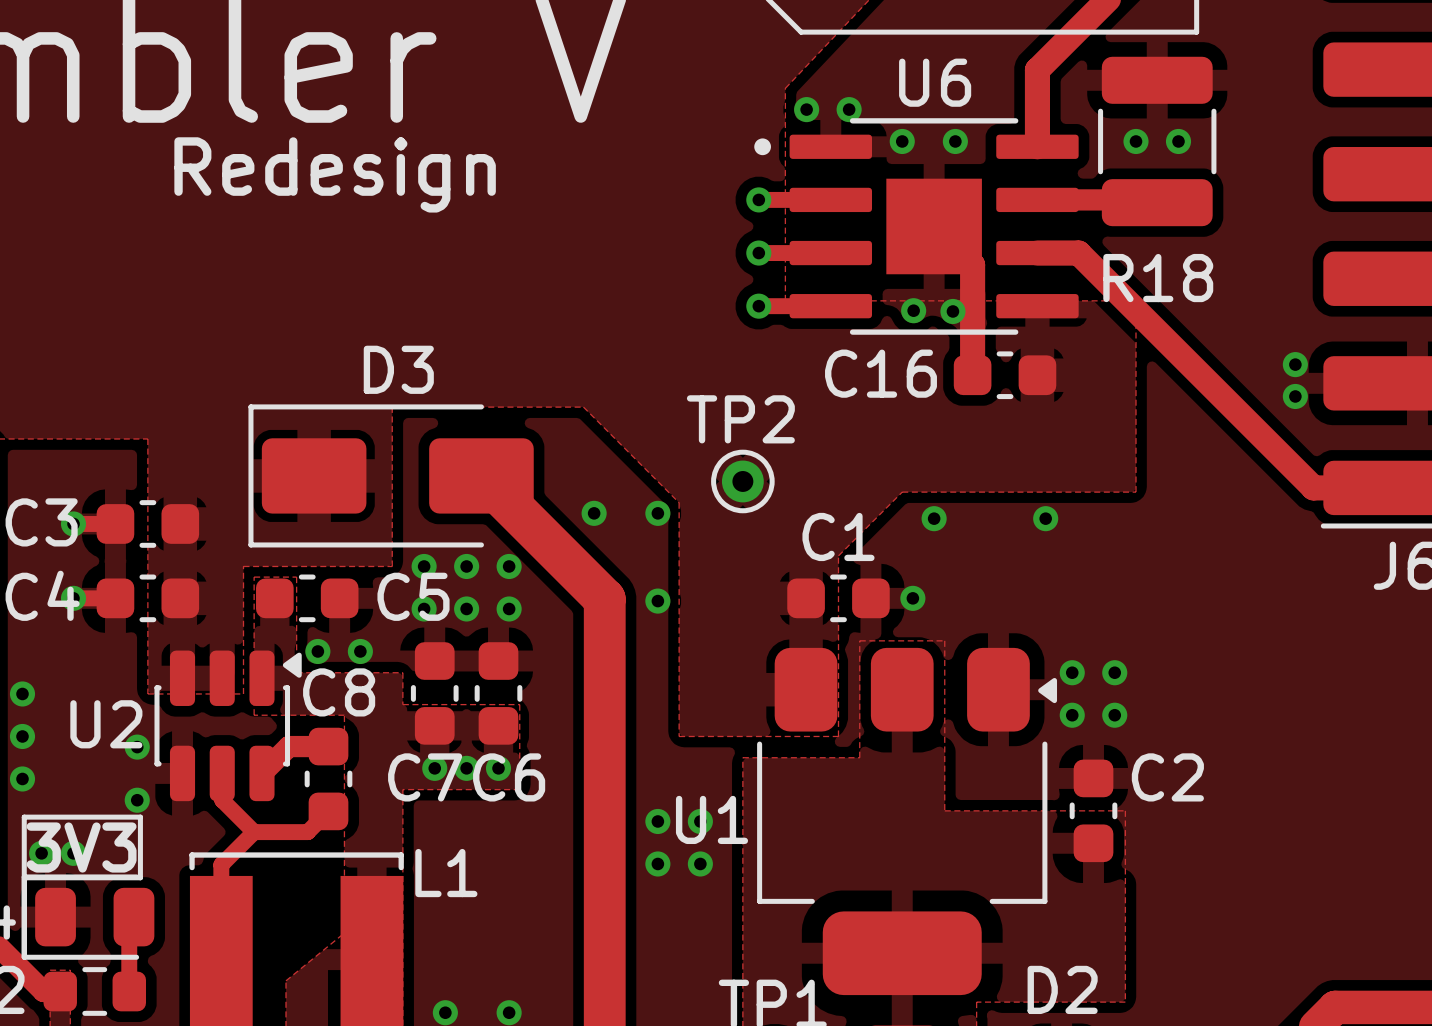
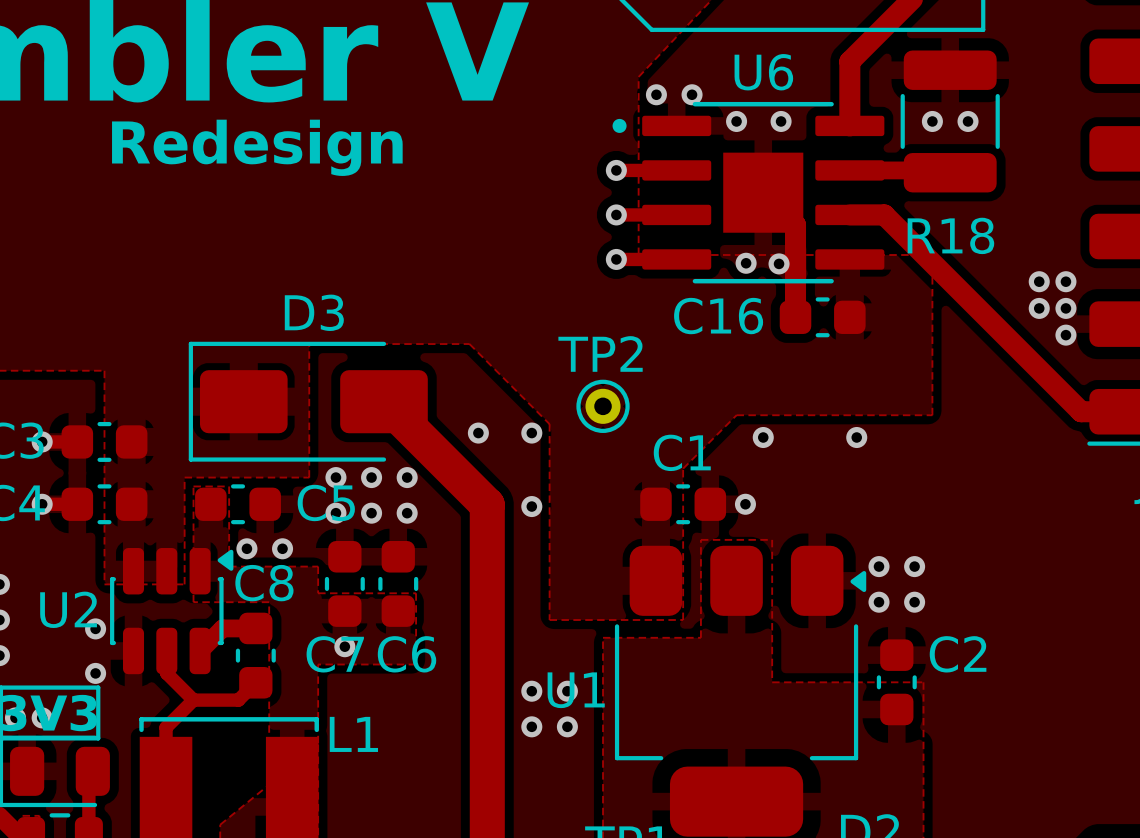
via: none -> (1039, 281)
via: none -> (1065, 281)
via: none -> (1039, 308)
via: (466, 768) -> none
via: (498, 768) -> none

